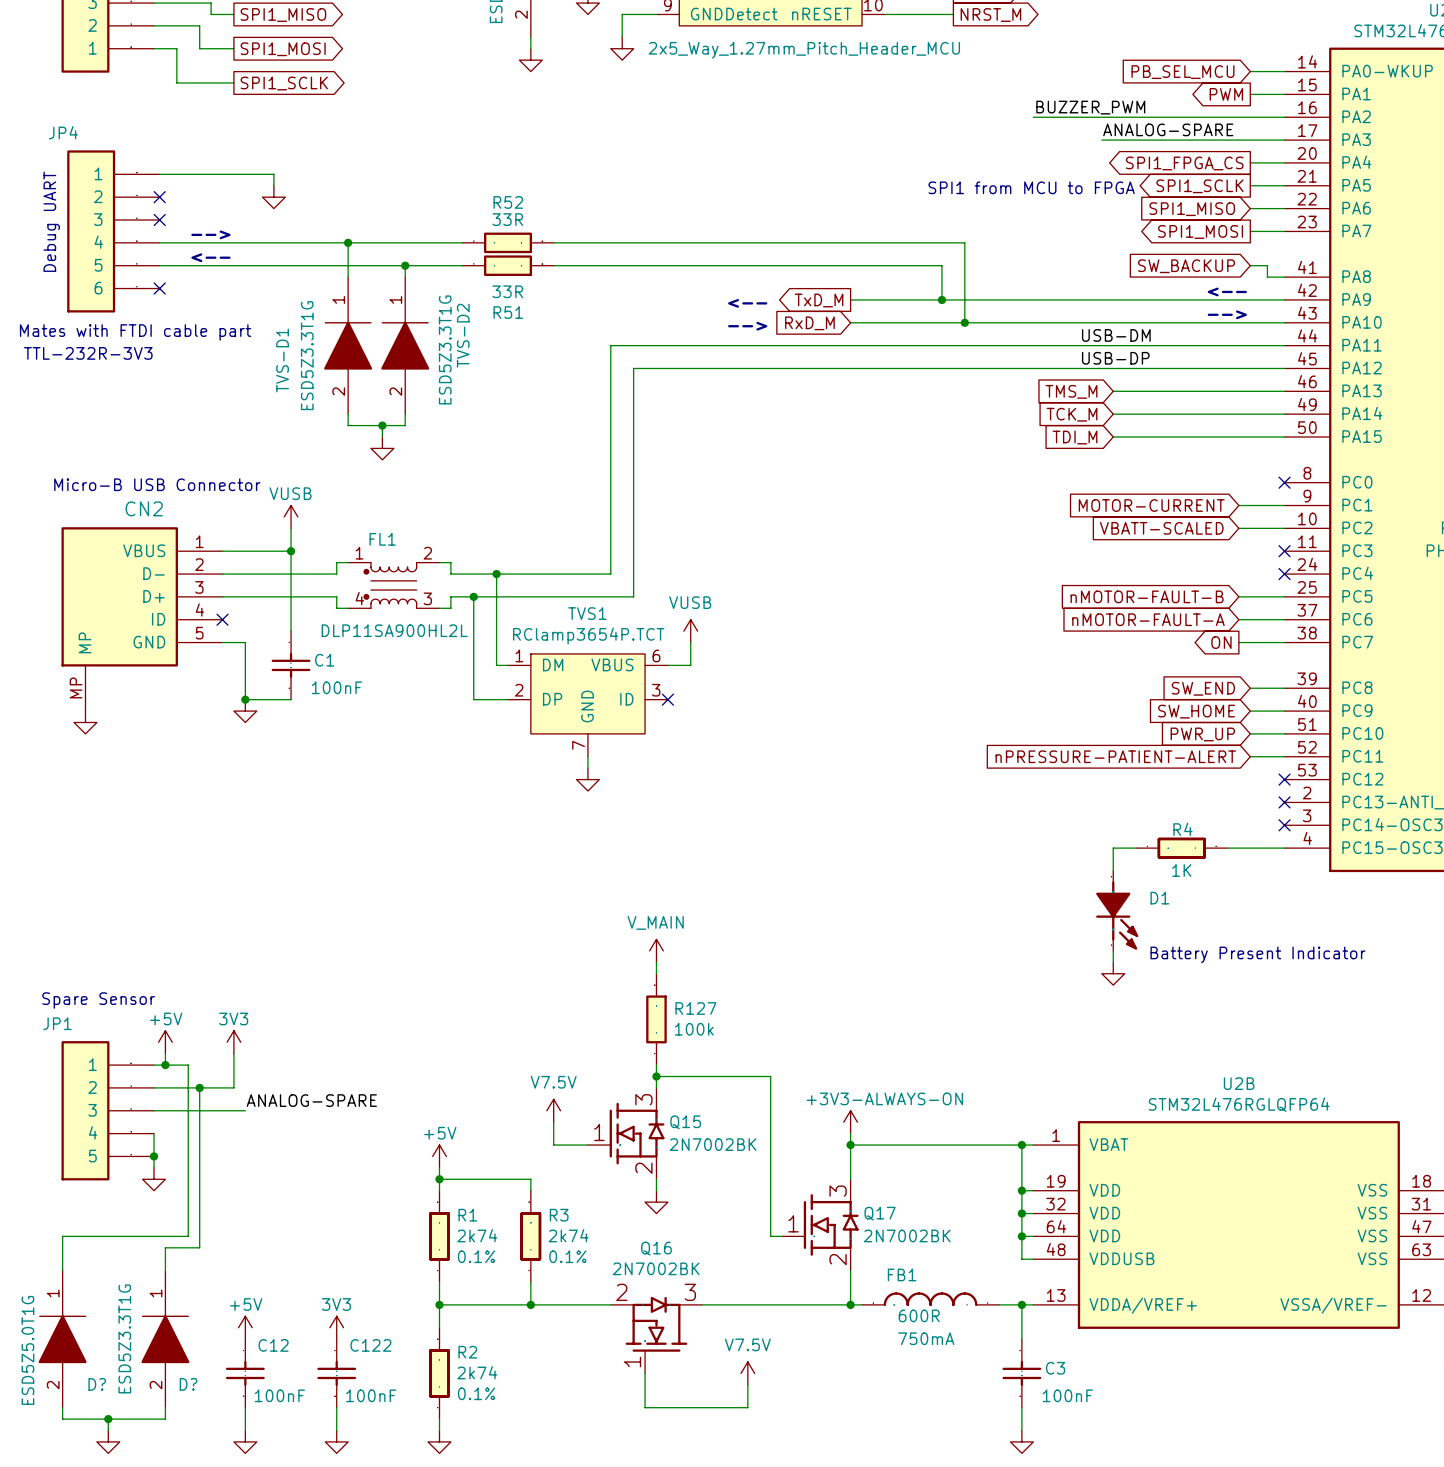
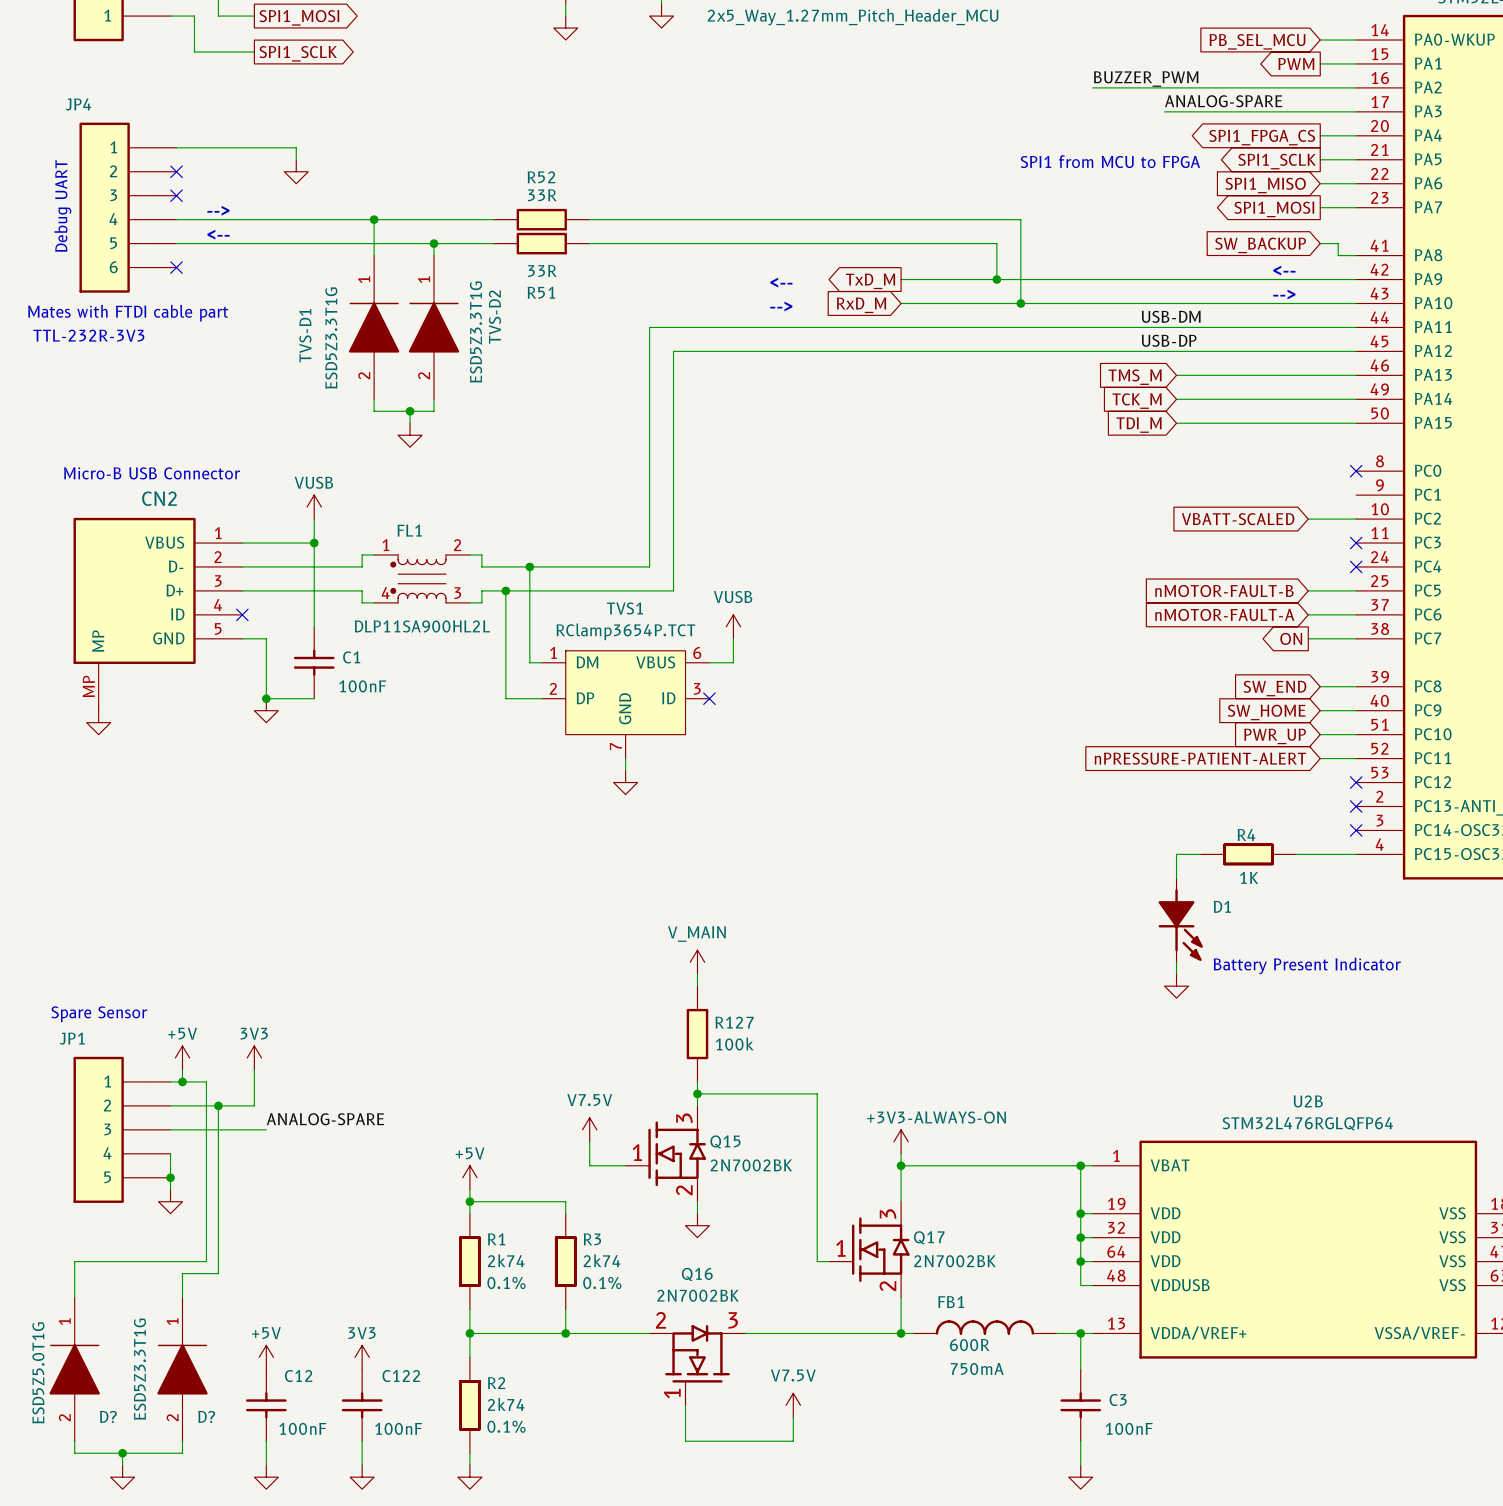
global label: MOTOR-CURRENT (1151, 505) -> none
wire: (1238, 505) (1284, 505) -> none

